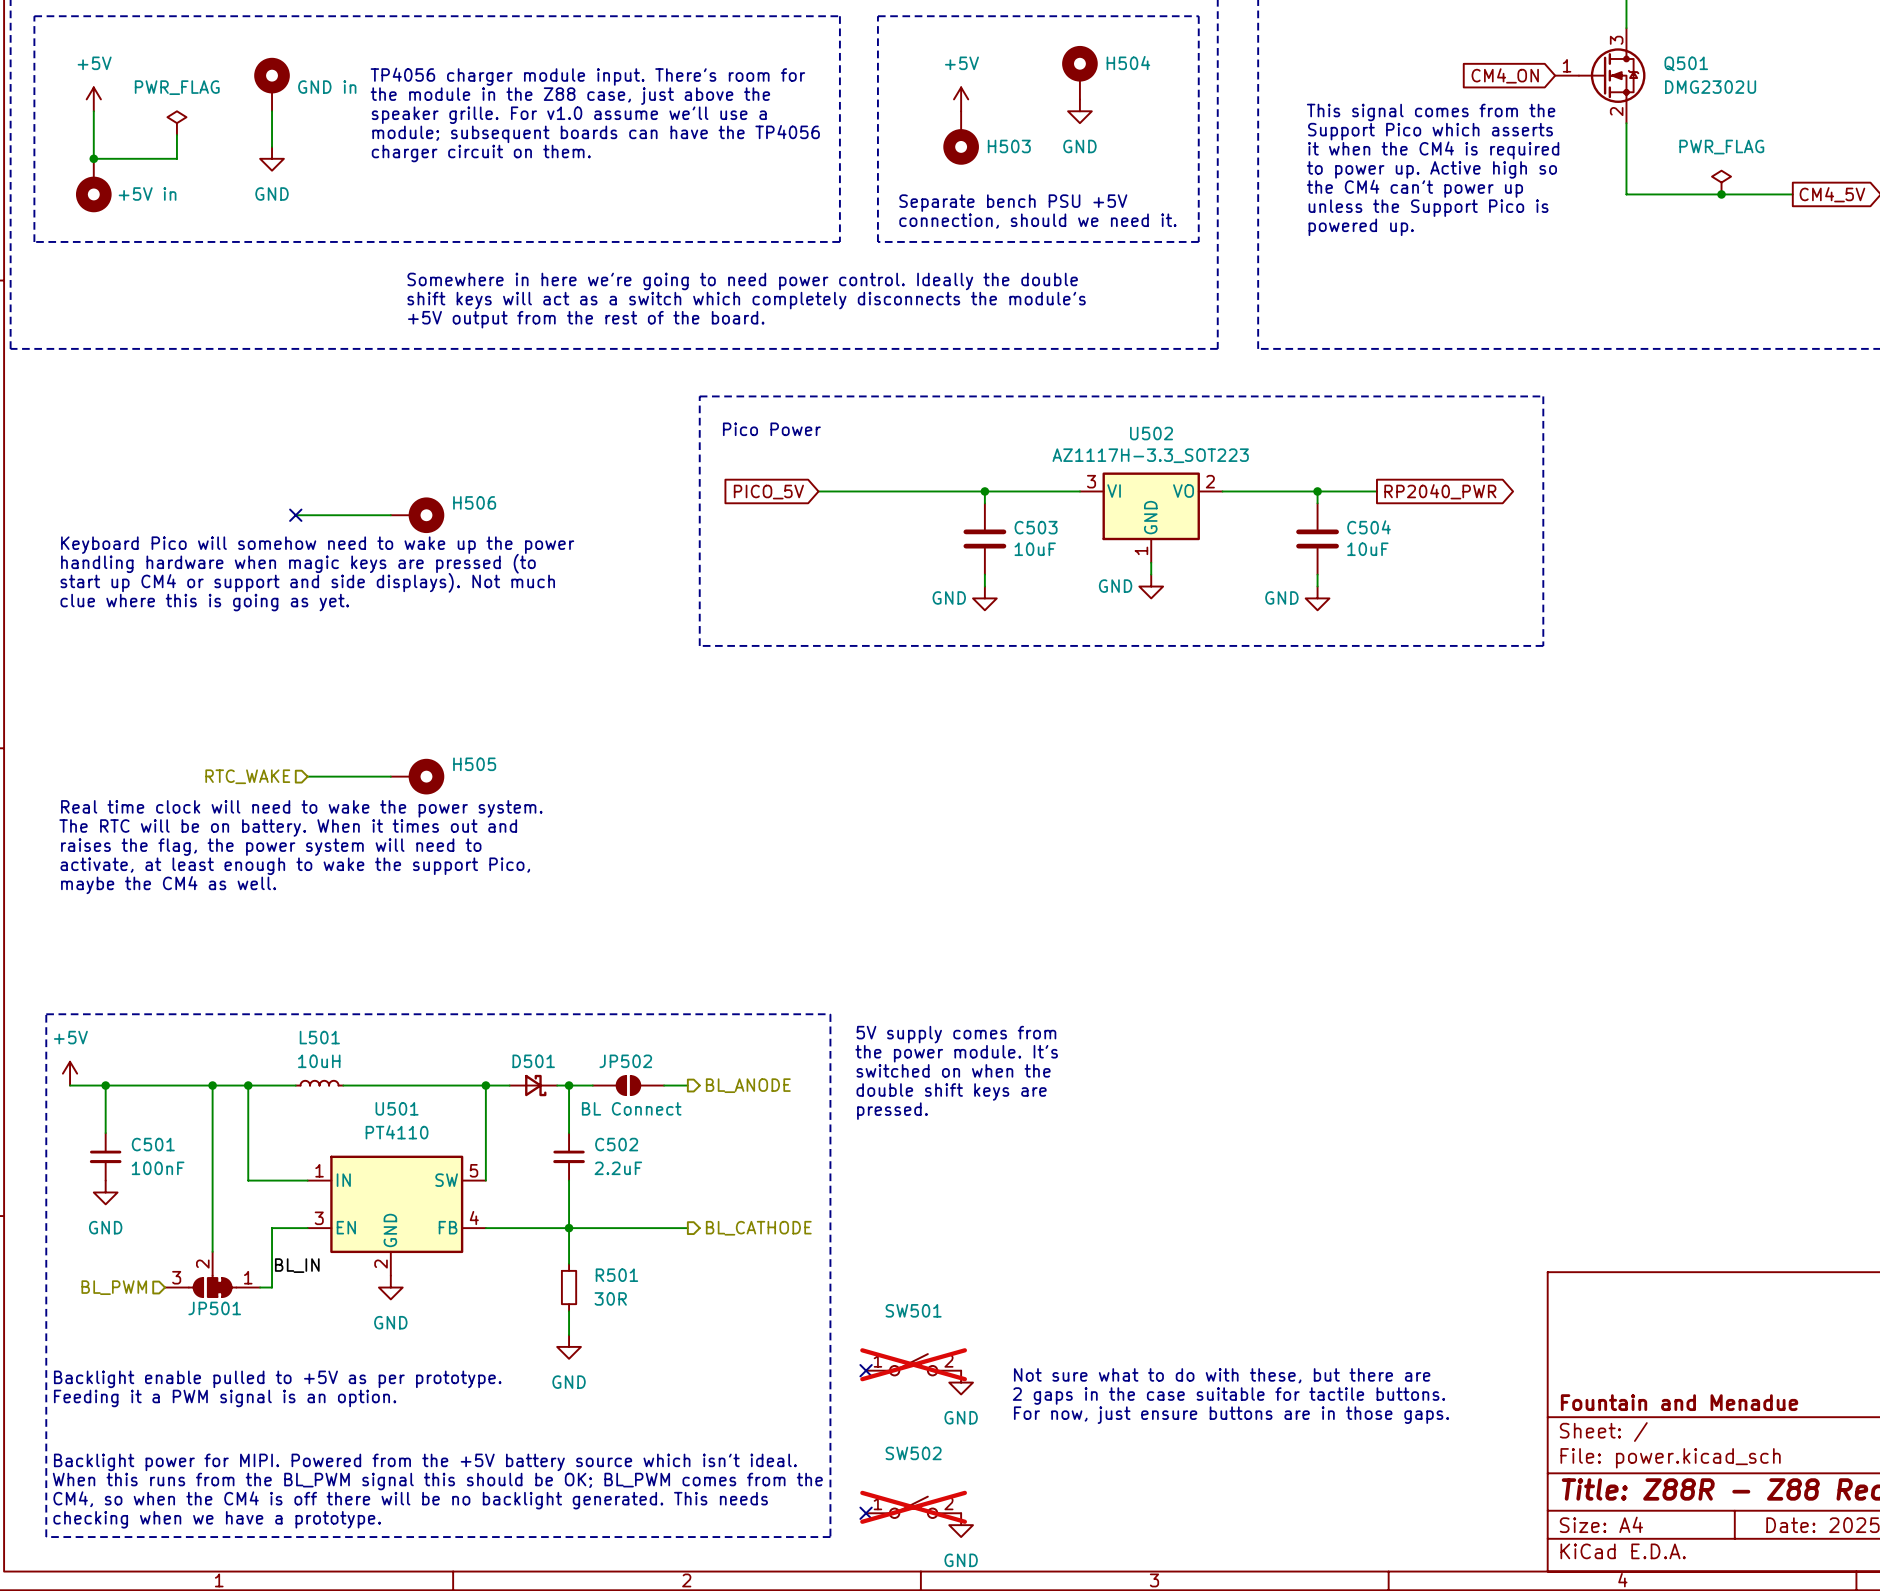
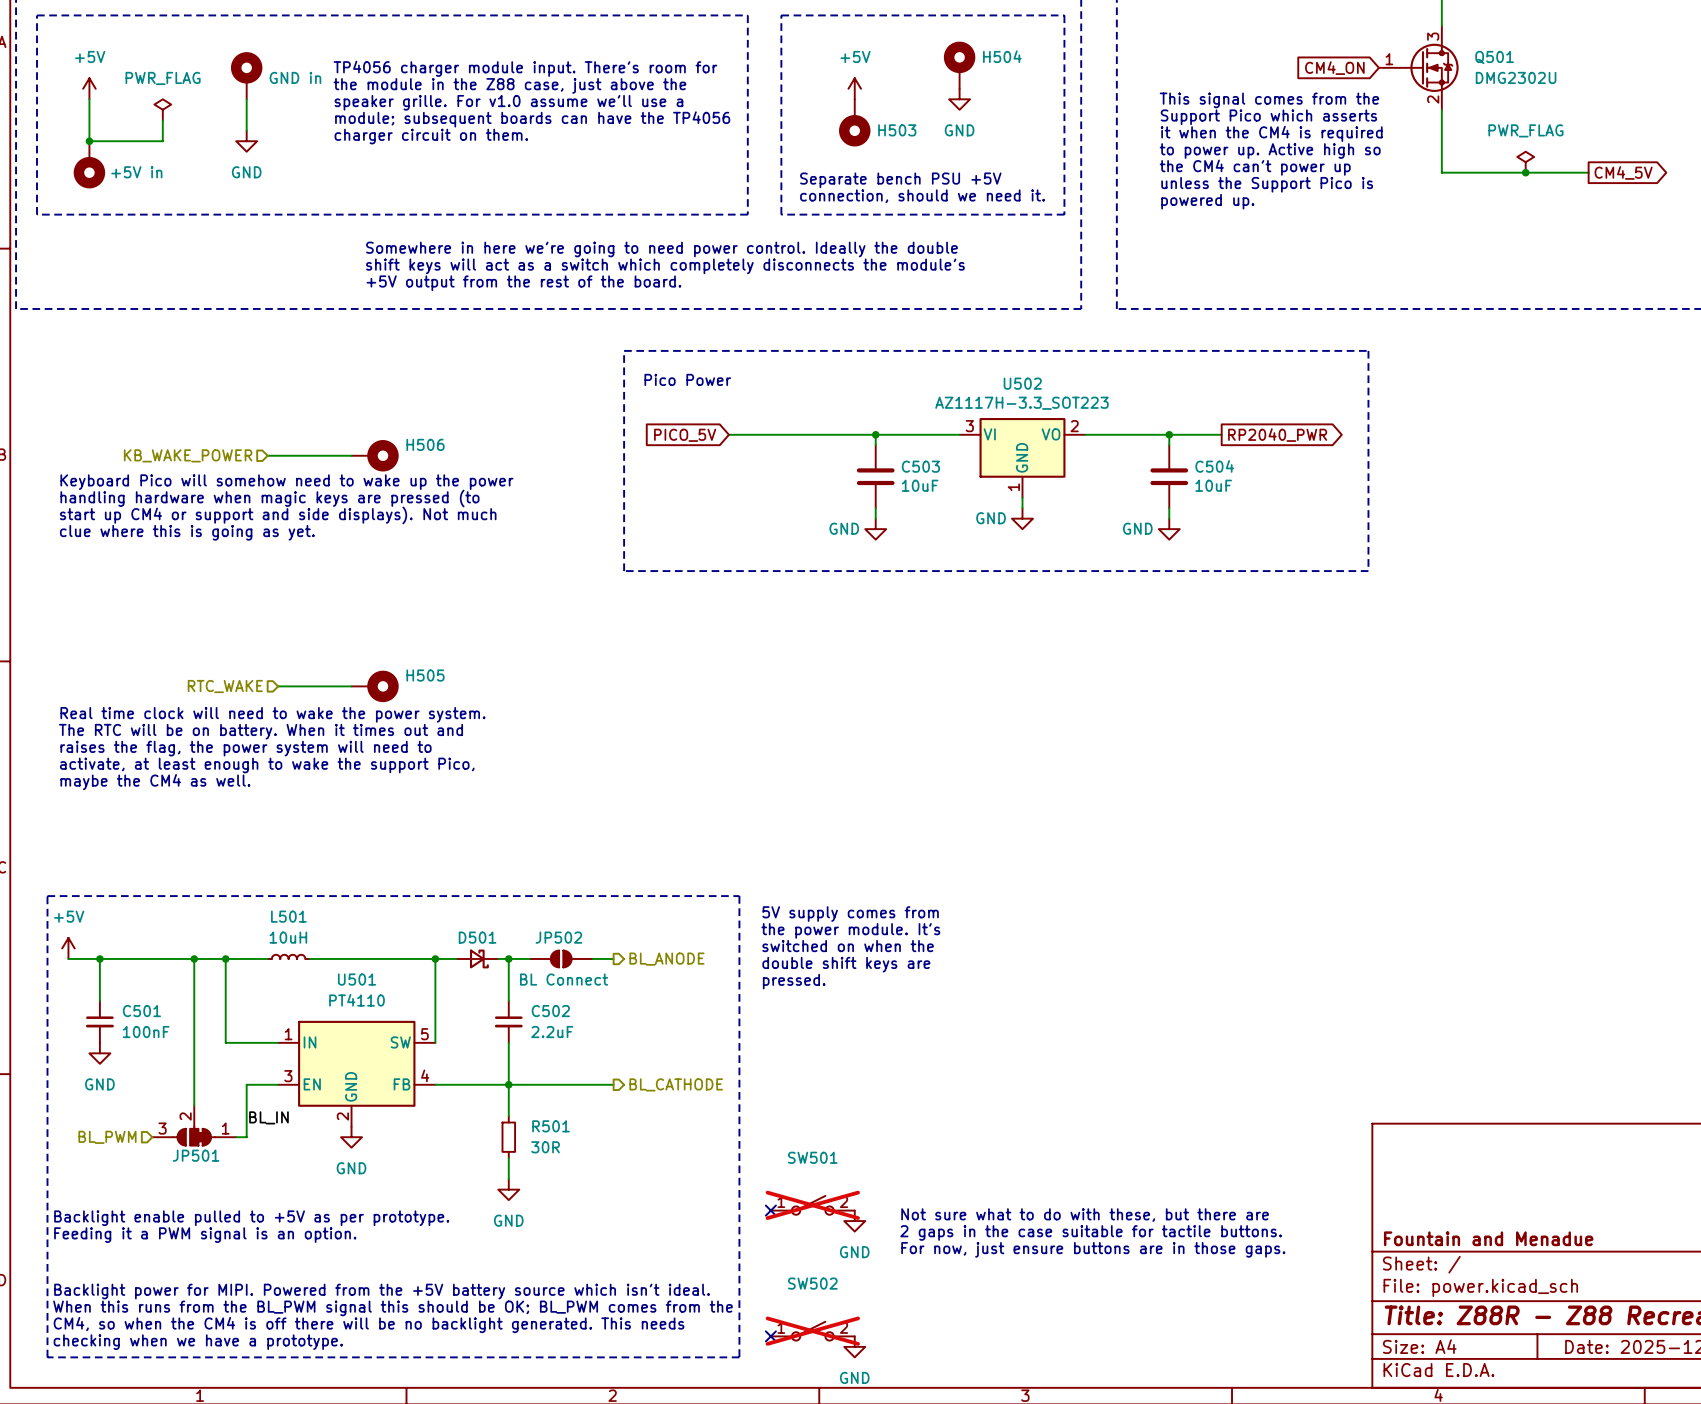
hierarchical label: none -> KB_WAKE_POWER (188, 455)
no-connect mark: (295, 515) -> none

